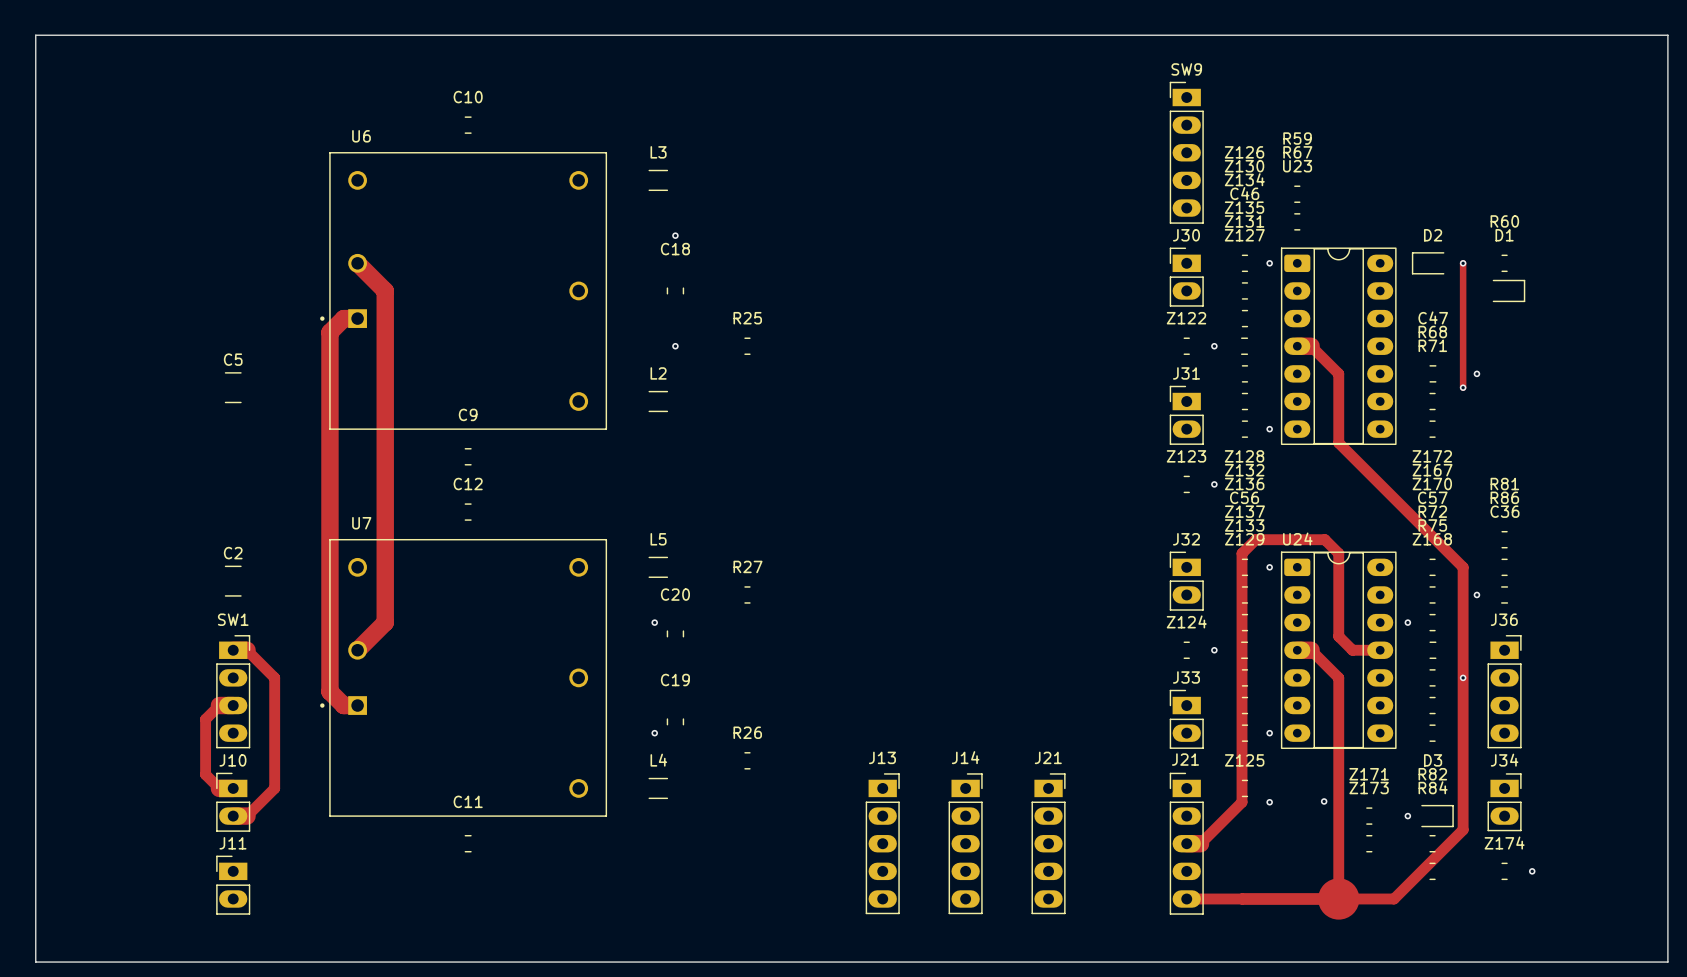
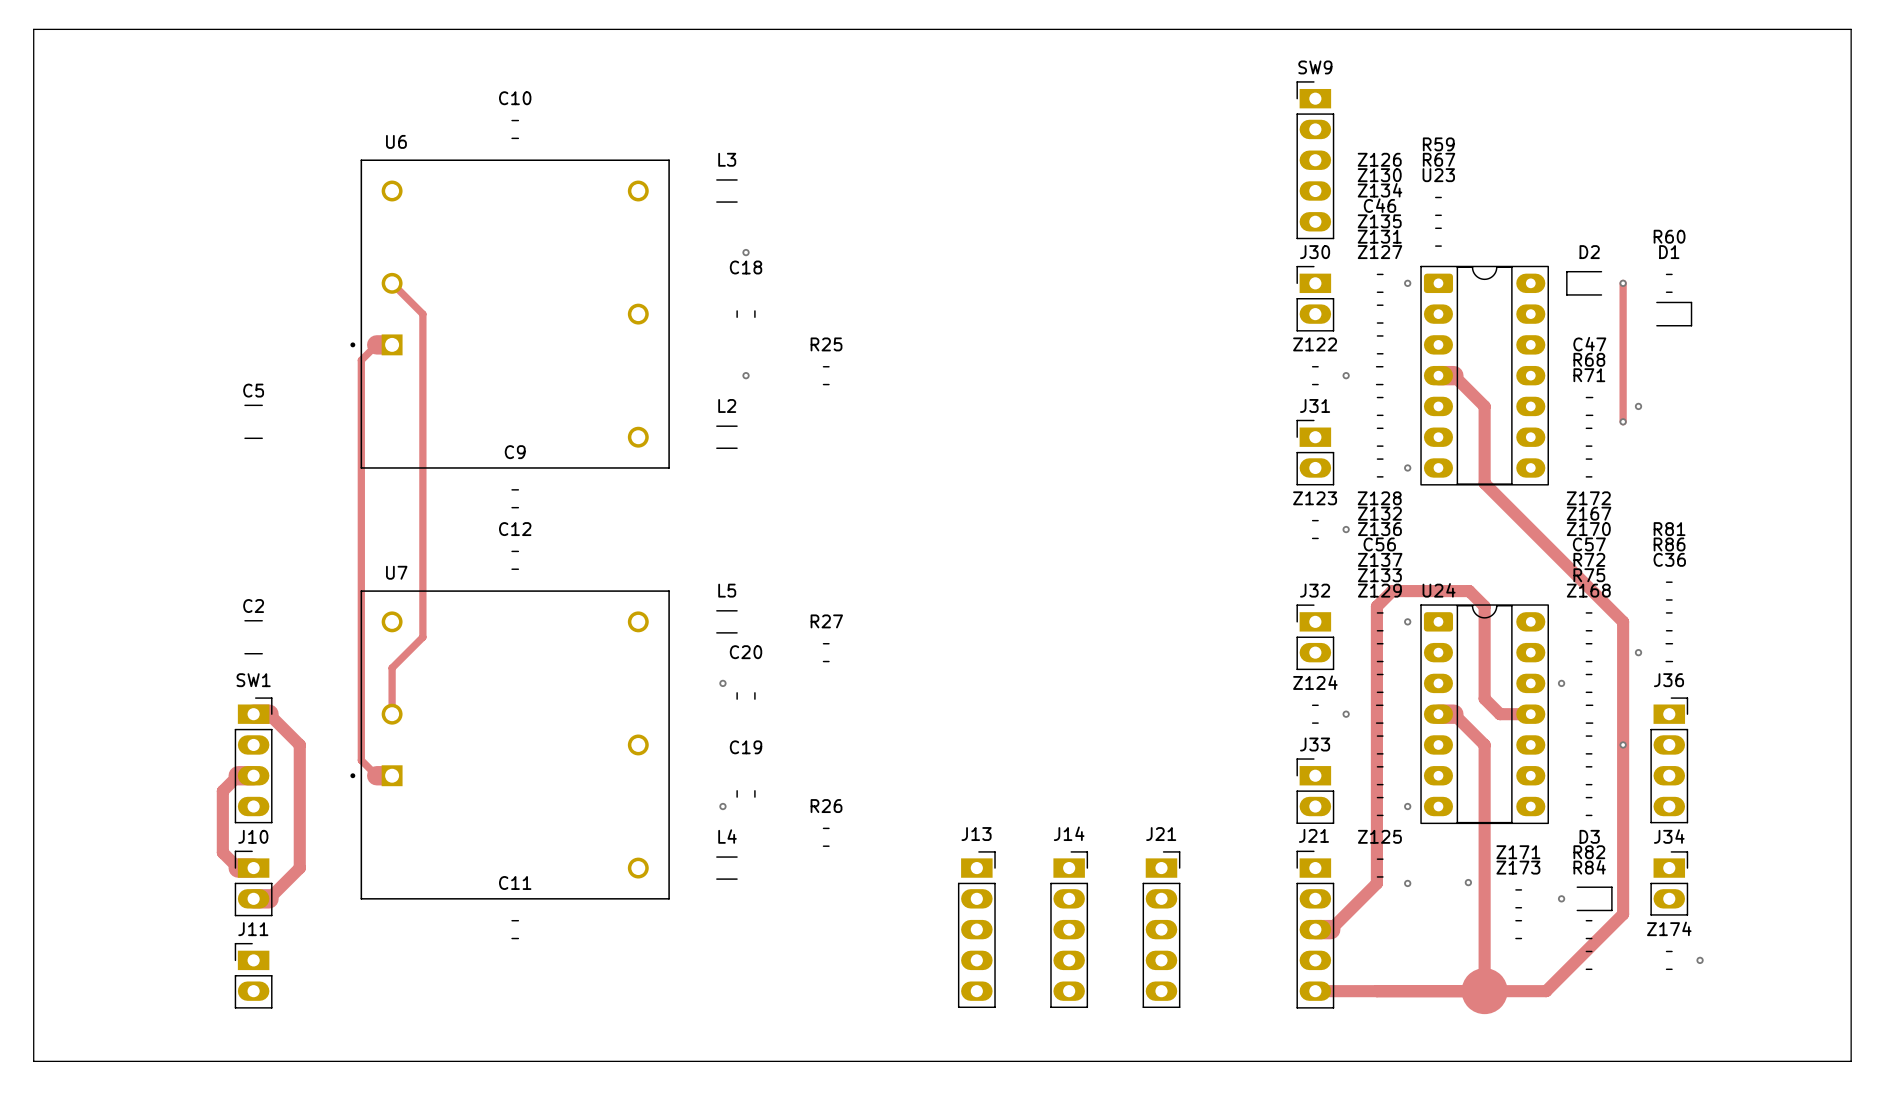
track width: thick (357, 263) (385, 290) (385, 581) -> thin (392, 283) (422, 314) (422, 637)
track width: thick (343, 318) (329, 332) (329, 691) (343, 705) -> thin (376, 344) (361, 360) (361, 760) (376, 775)
track: (385, 581) (385, 622) (357, 650) -> (422, 637) (392, 668) (392, 714)

